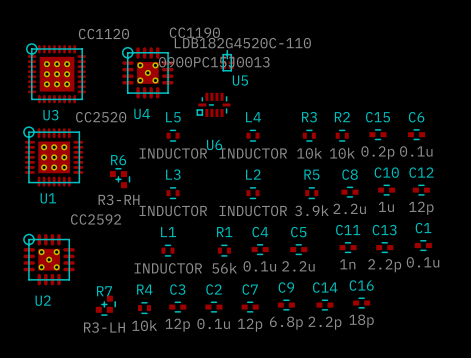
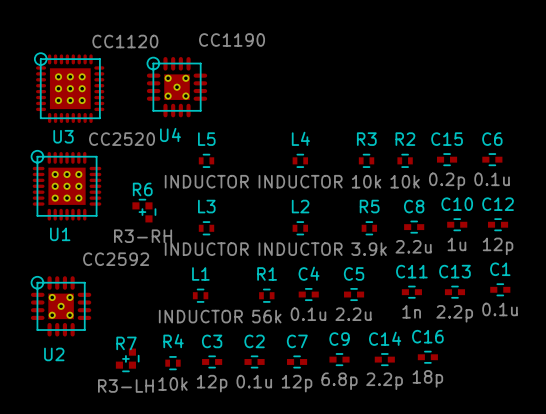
U5: LDB182G4520C-110 (227, 60) -> none
U6: 0900PC15J0013 (213, 104) -> none

